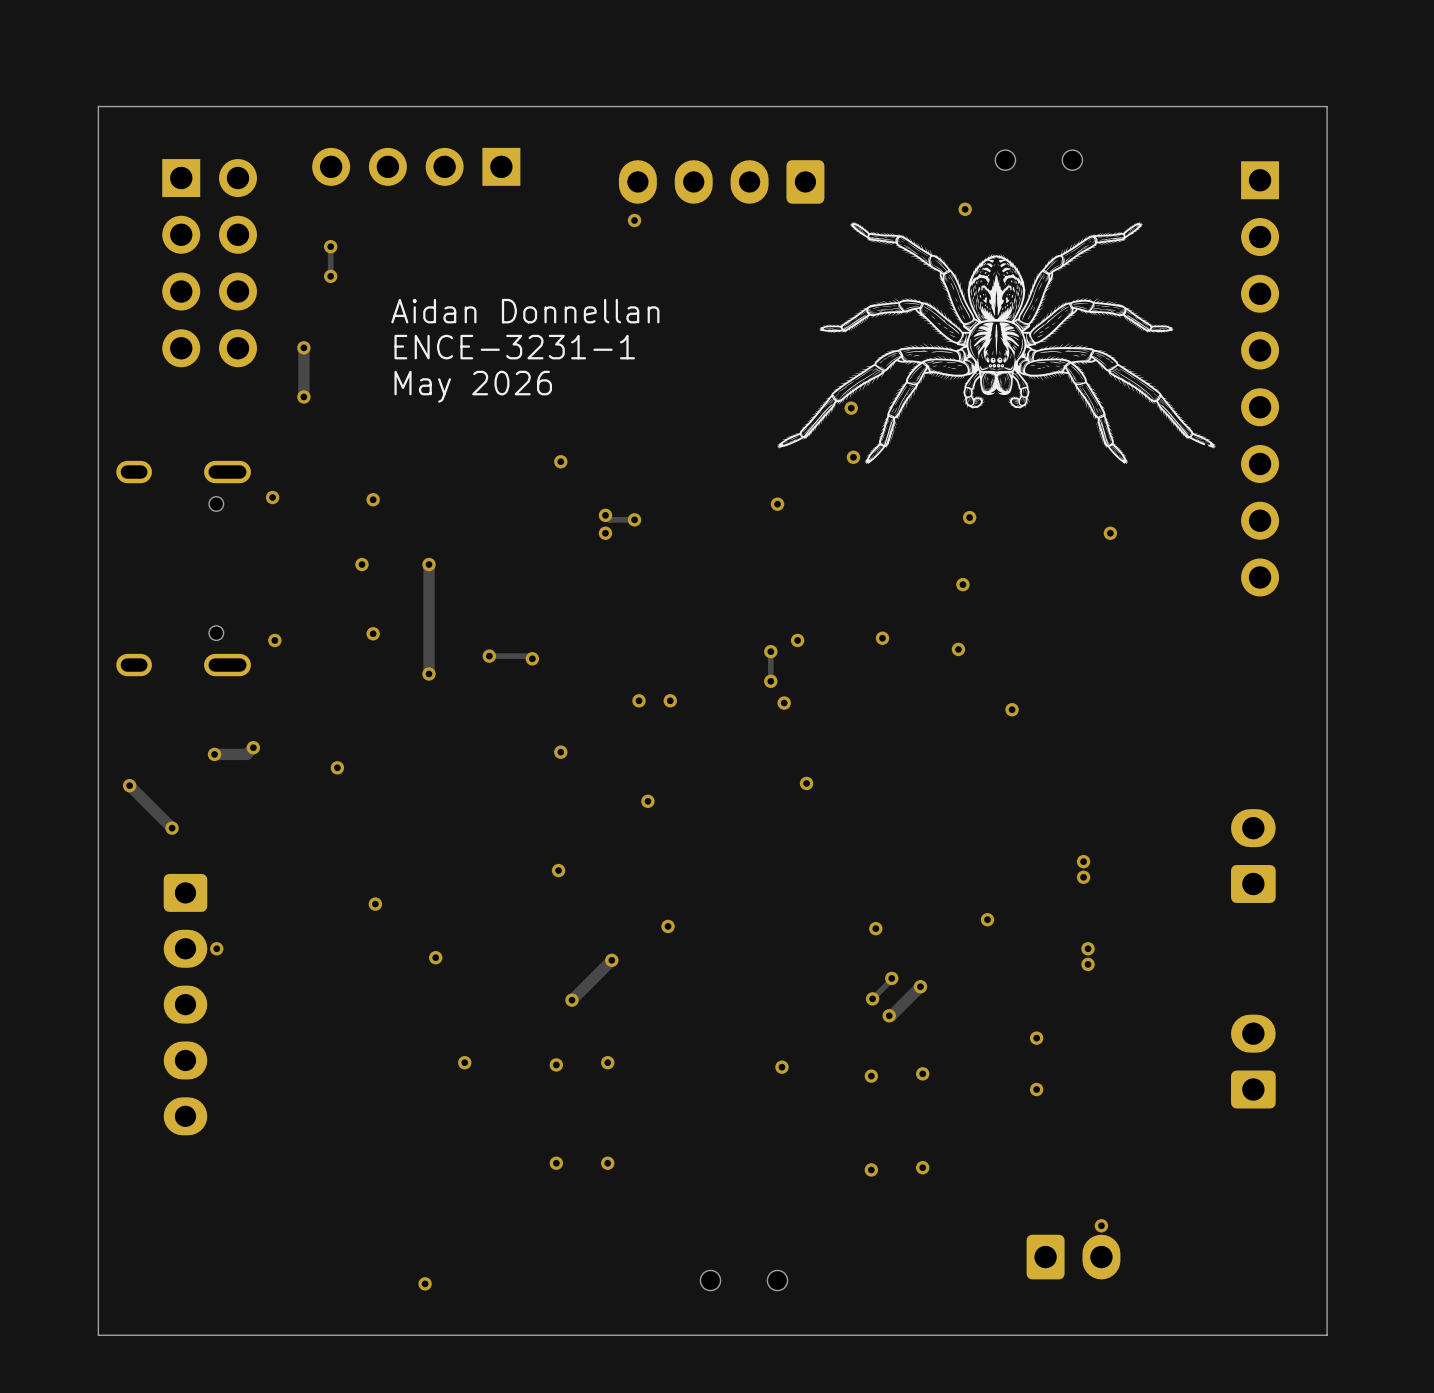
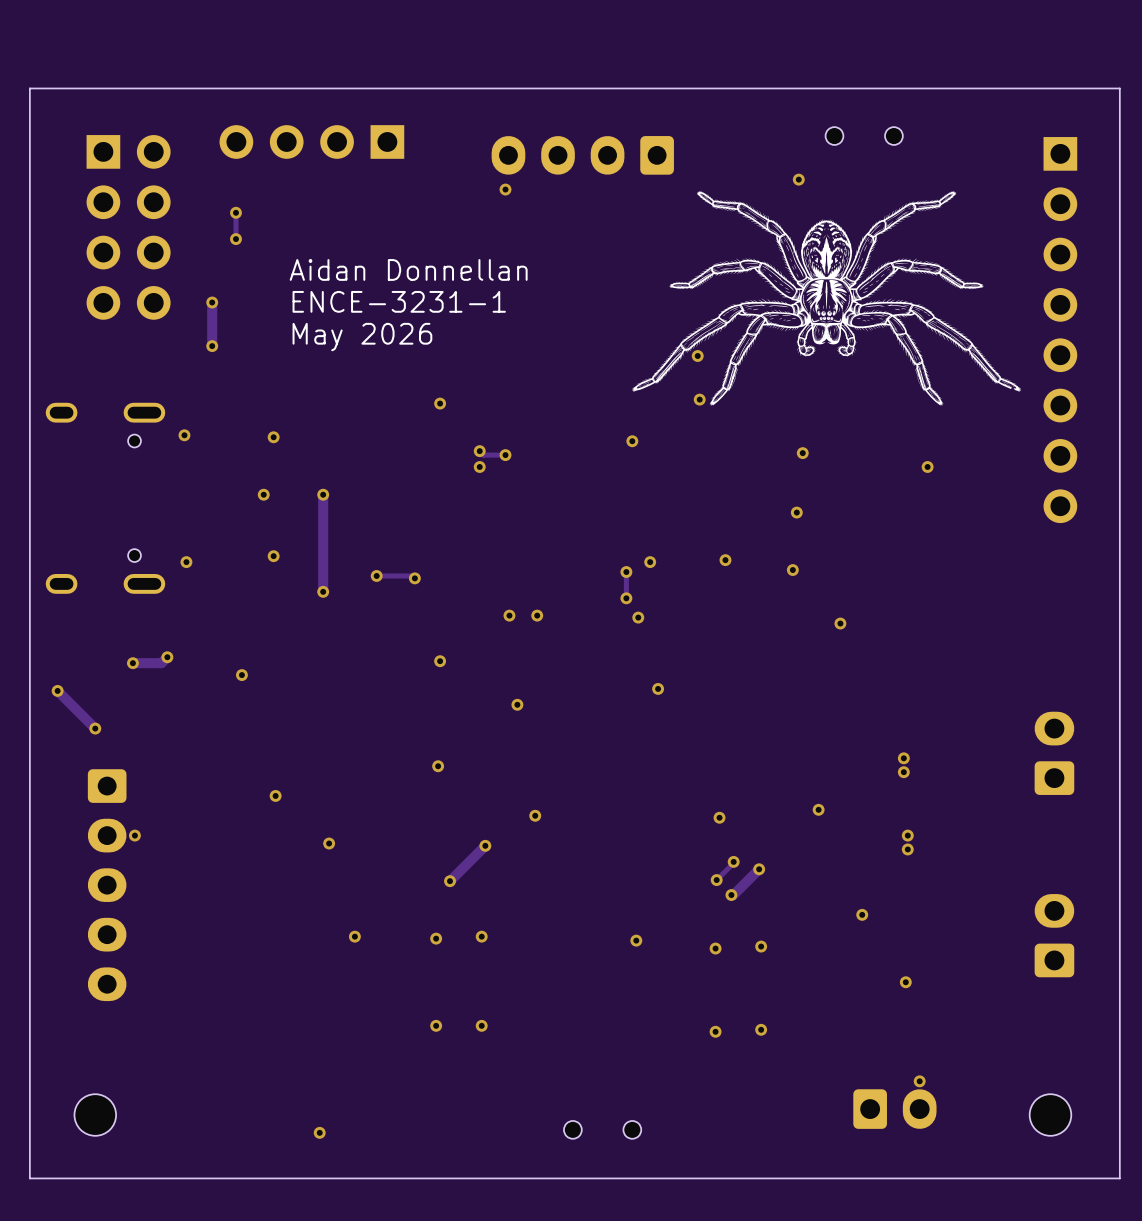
via position: (1036, 1089) -> (905, 982)
part: none -> (95, 1115)
part: none -> (1050, 1115)

